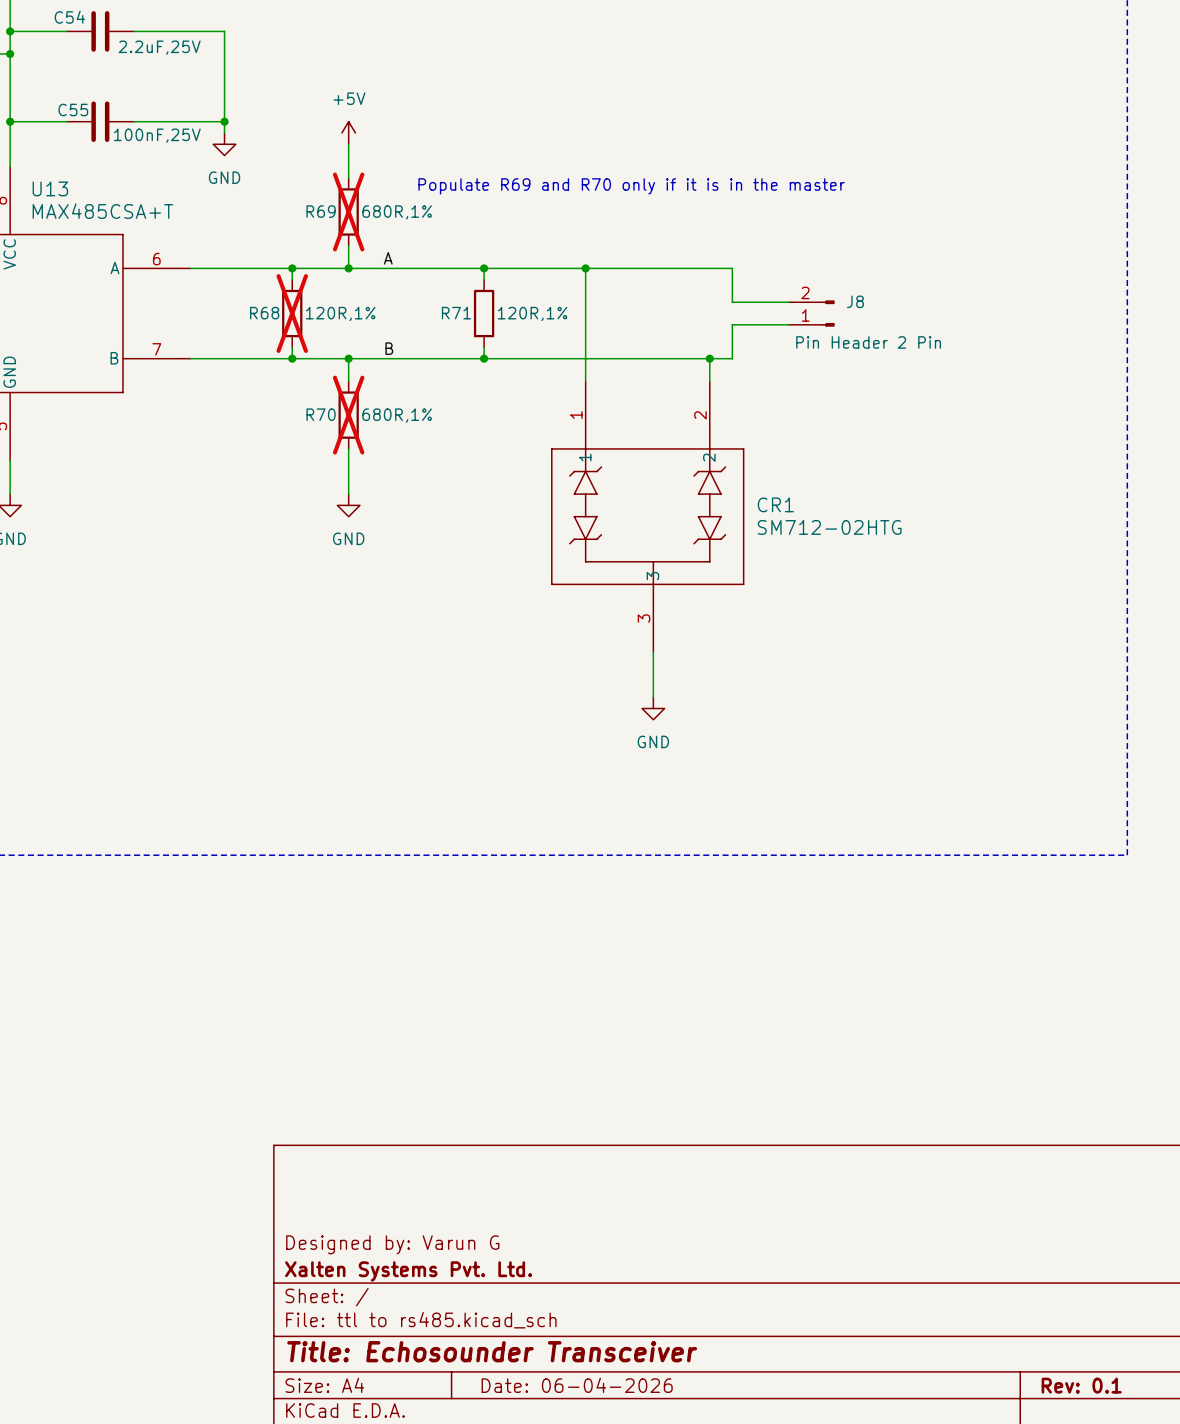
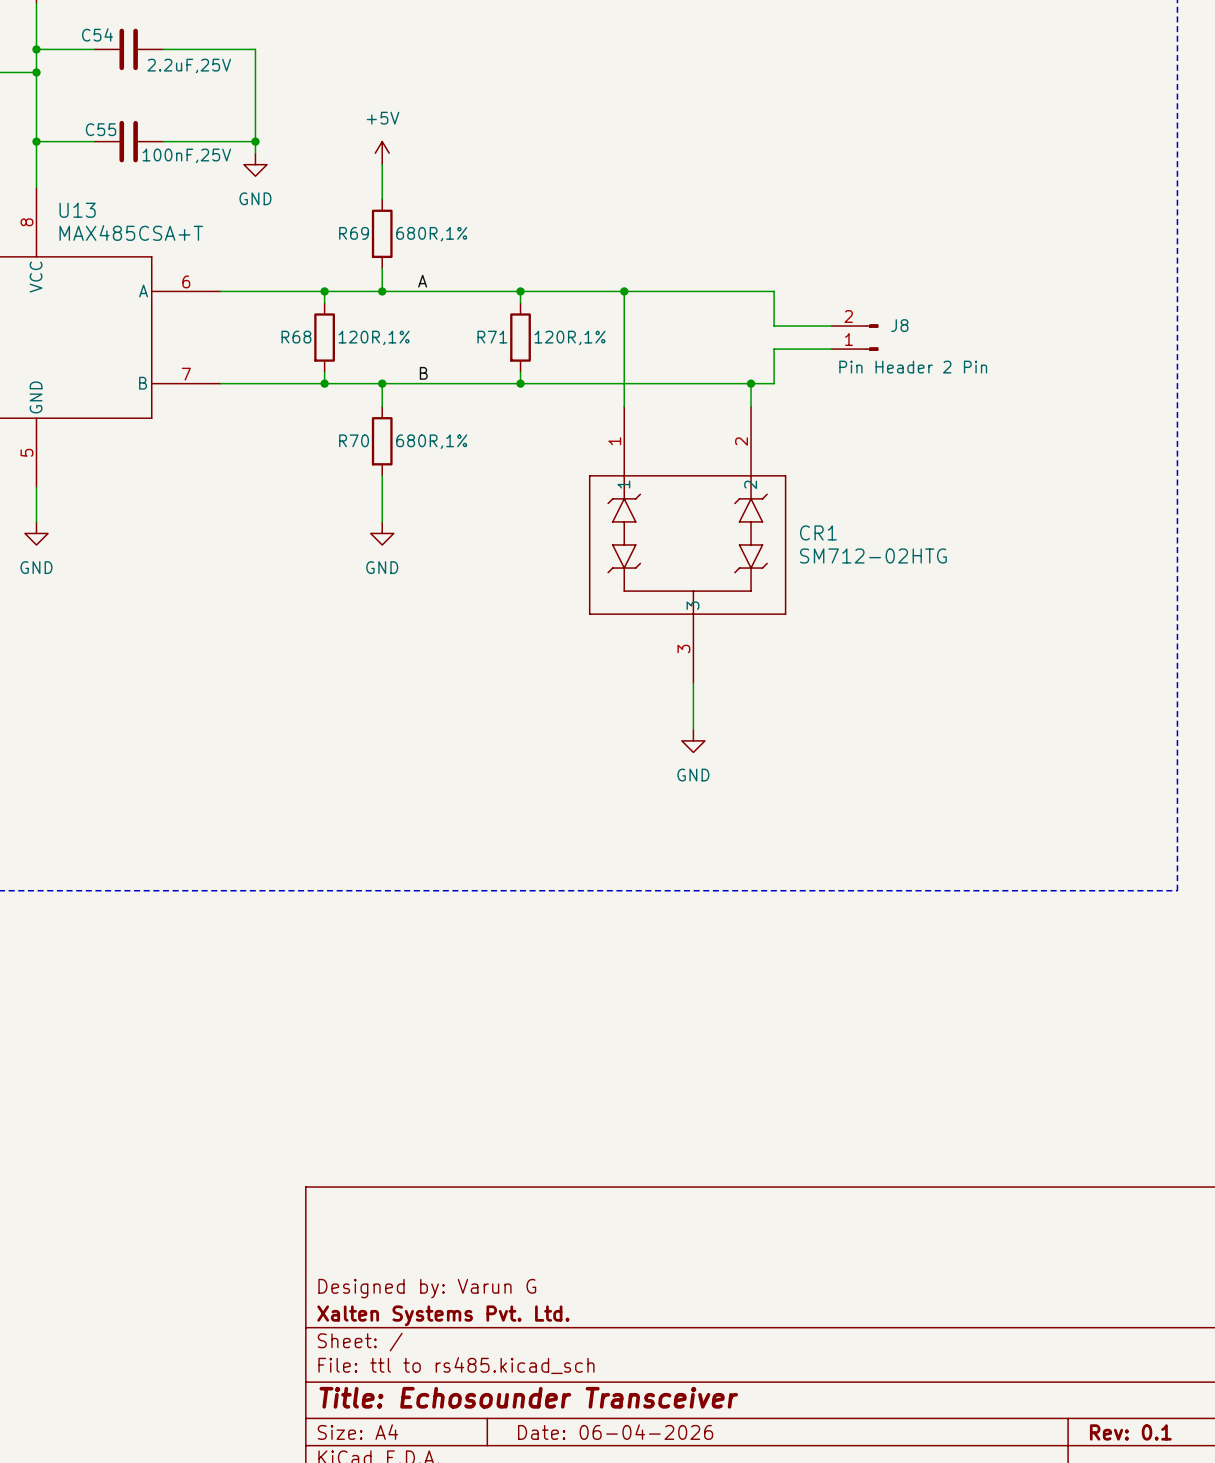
text: Populate R69 and R70 only if it is in the master (631, 186) -> none
R69 do-not-place cross: (348, 211) -> none
R68 do-not-place cross: (292, 313) -> none
R70 do-not-place cross: (348, 415) -> none

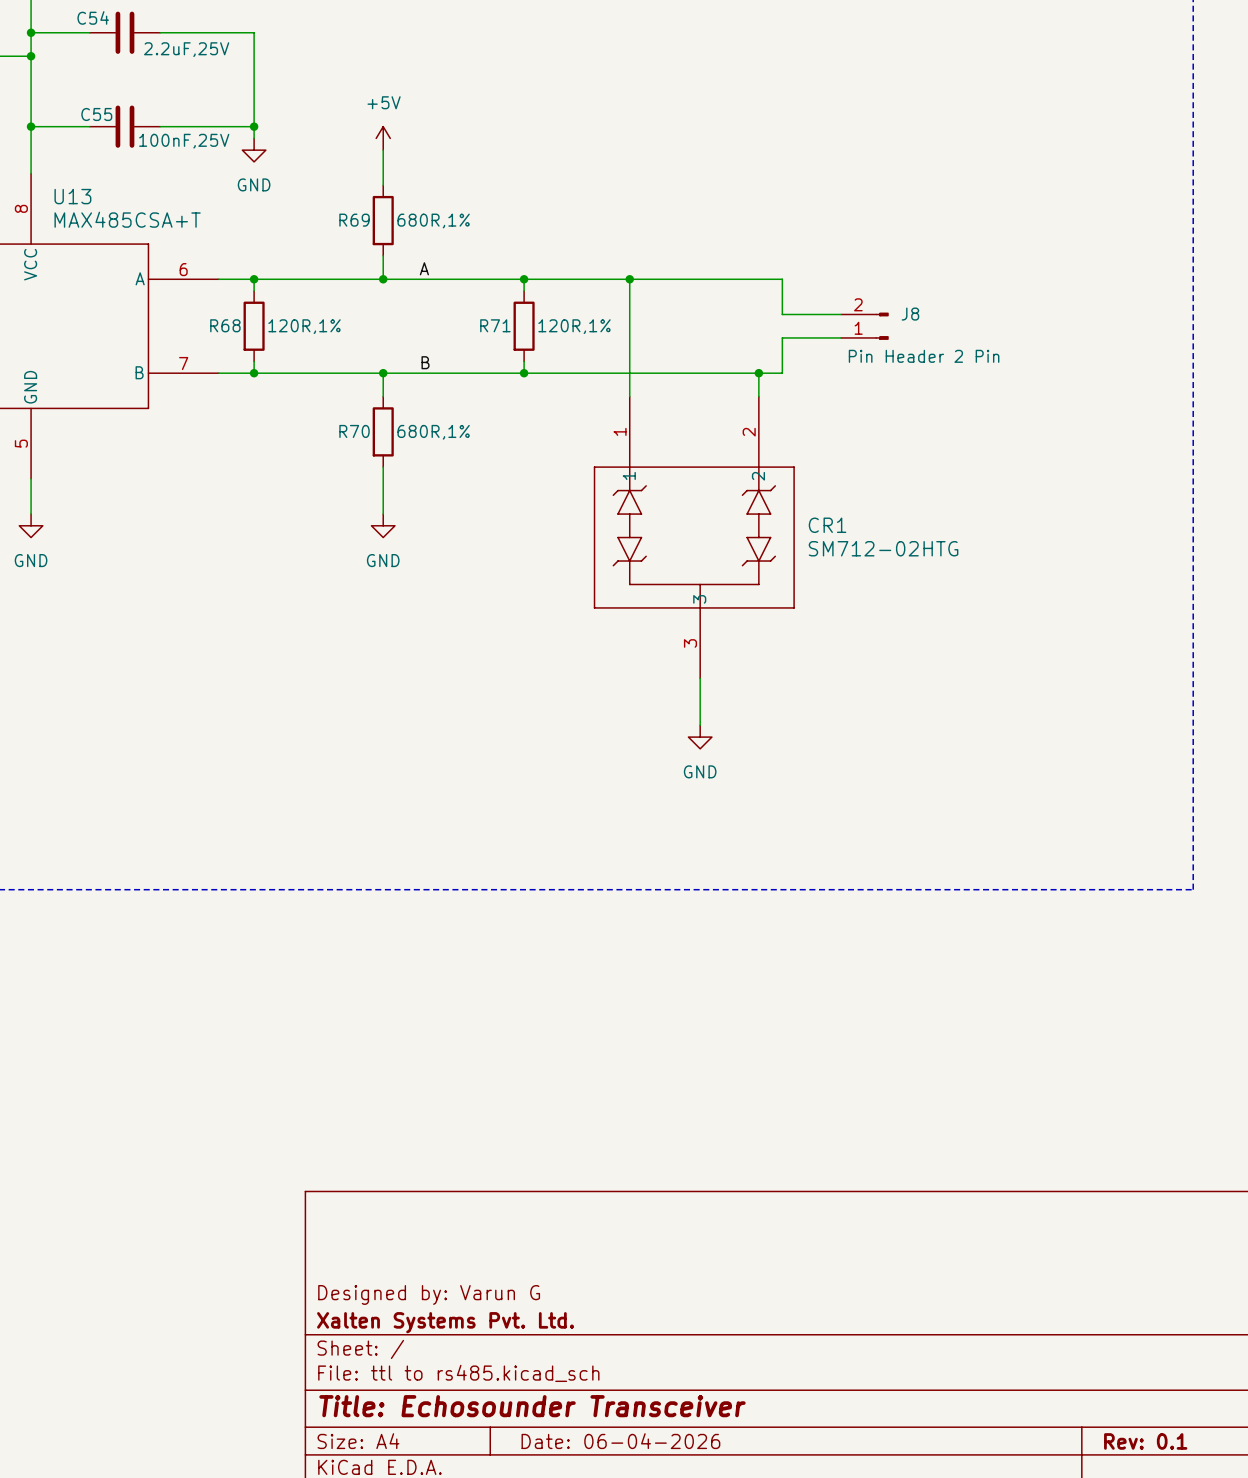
junction: none -> (254, 279)
wire: (324, 291) (324, 302) -> (254, 279) (254, 291)
junction: (324, 291) -> none
R68 position: (324, 337) -> (254, 326)
wire: (324, 372) (324, 383) -> (254, 361) (254, 373)
junction: none -> (254, 373)
junction: (324, 383) -> none

